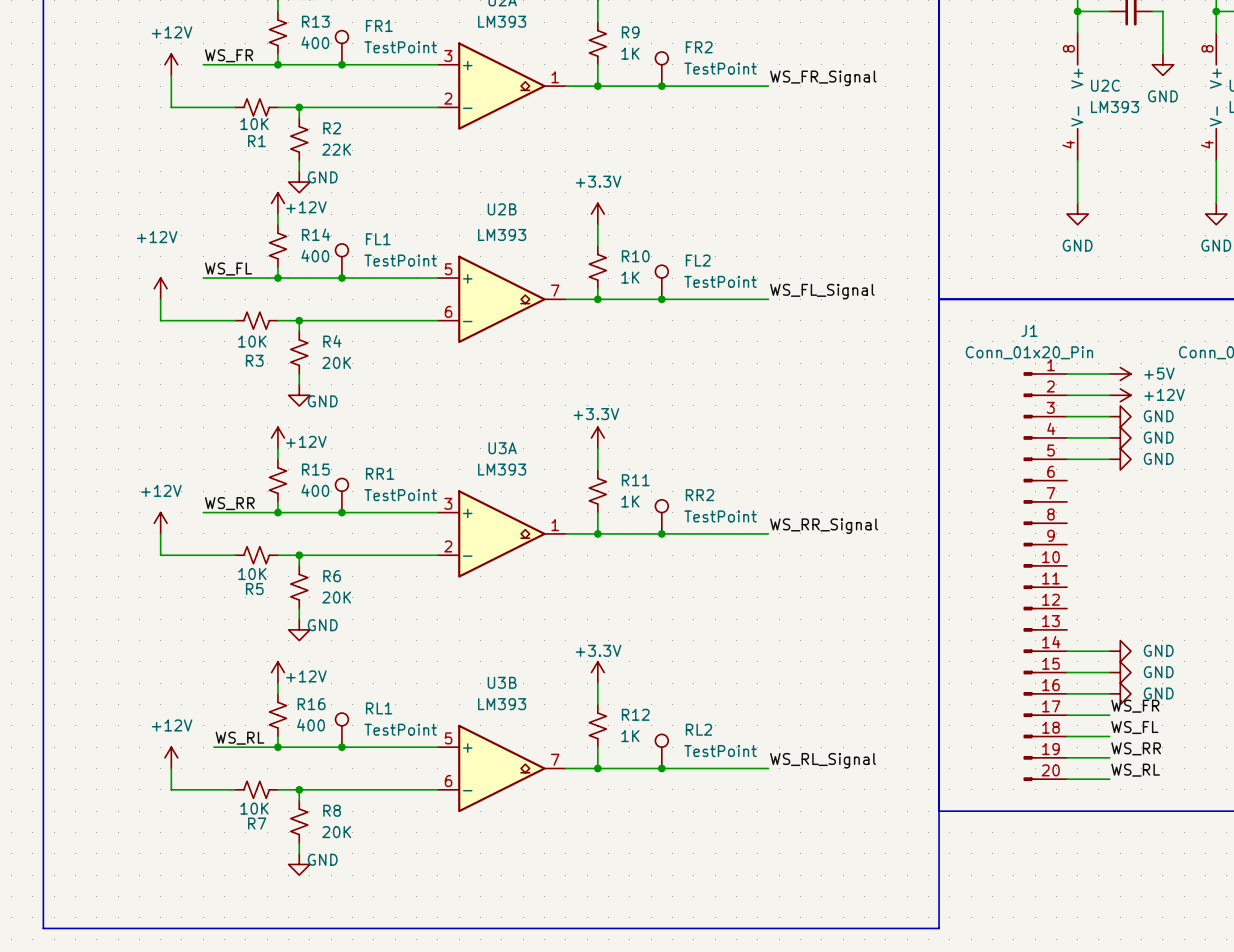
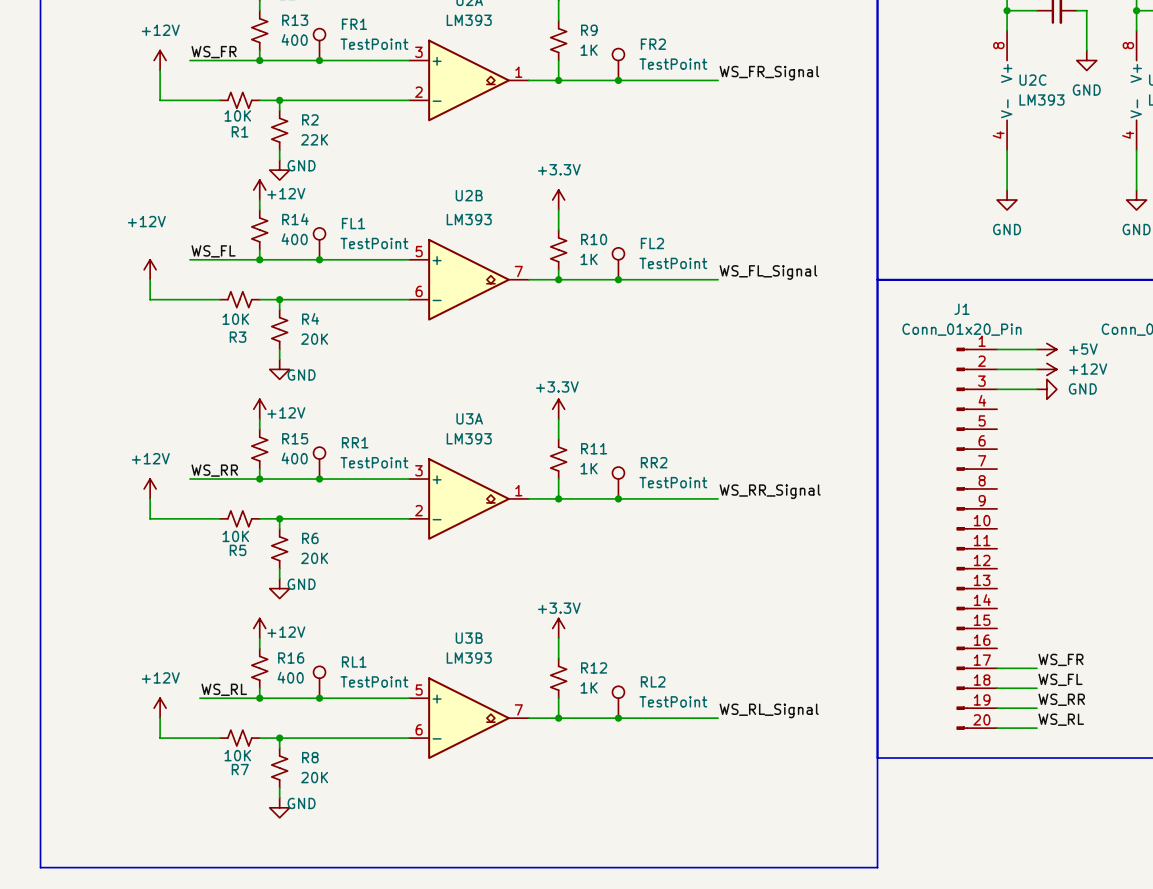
wire: (1067, 437) (1109, 437) -> none
power symbol: GND (1120, 437) -> none
wire: (1067, 459) (1109, 459) -> none
power symbol: GND (1120, 459) -> none
wire: (1067, 651) (1109, 651) -> none
power symbol: GND (1120, 651) -> none
wire: (1067, 672) (1109, 672) -> none
power symbol: GND (1120, 672) -> none
wire: (1067, 693) (1109, 693) -> none
power symbol: GND (1120, 693) -> none

